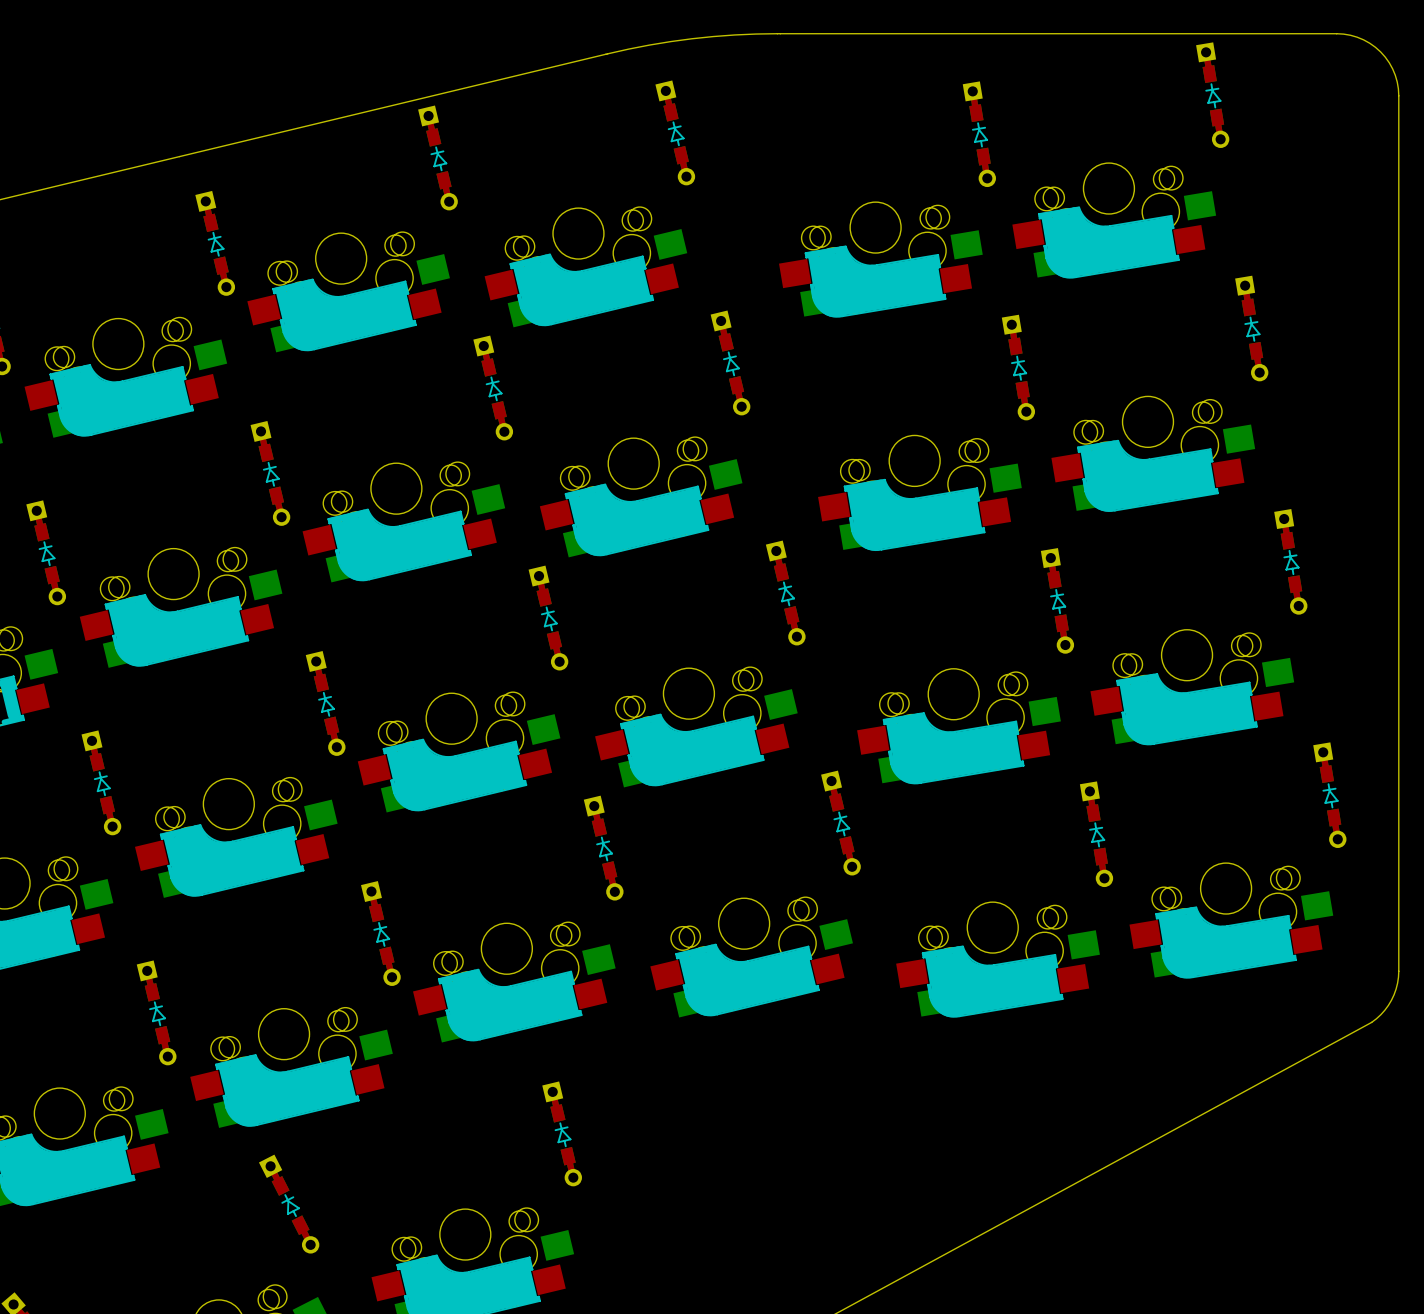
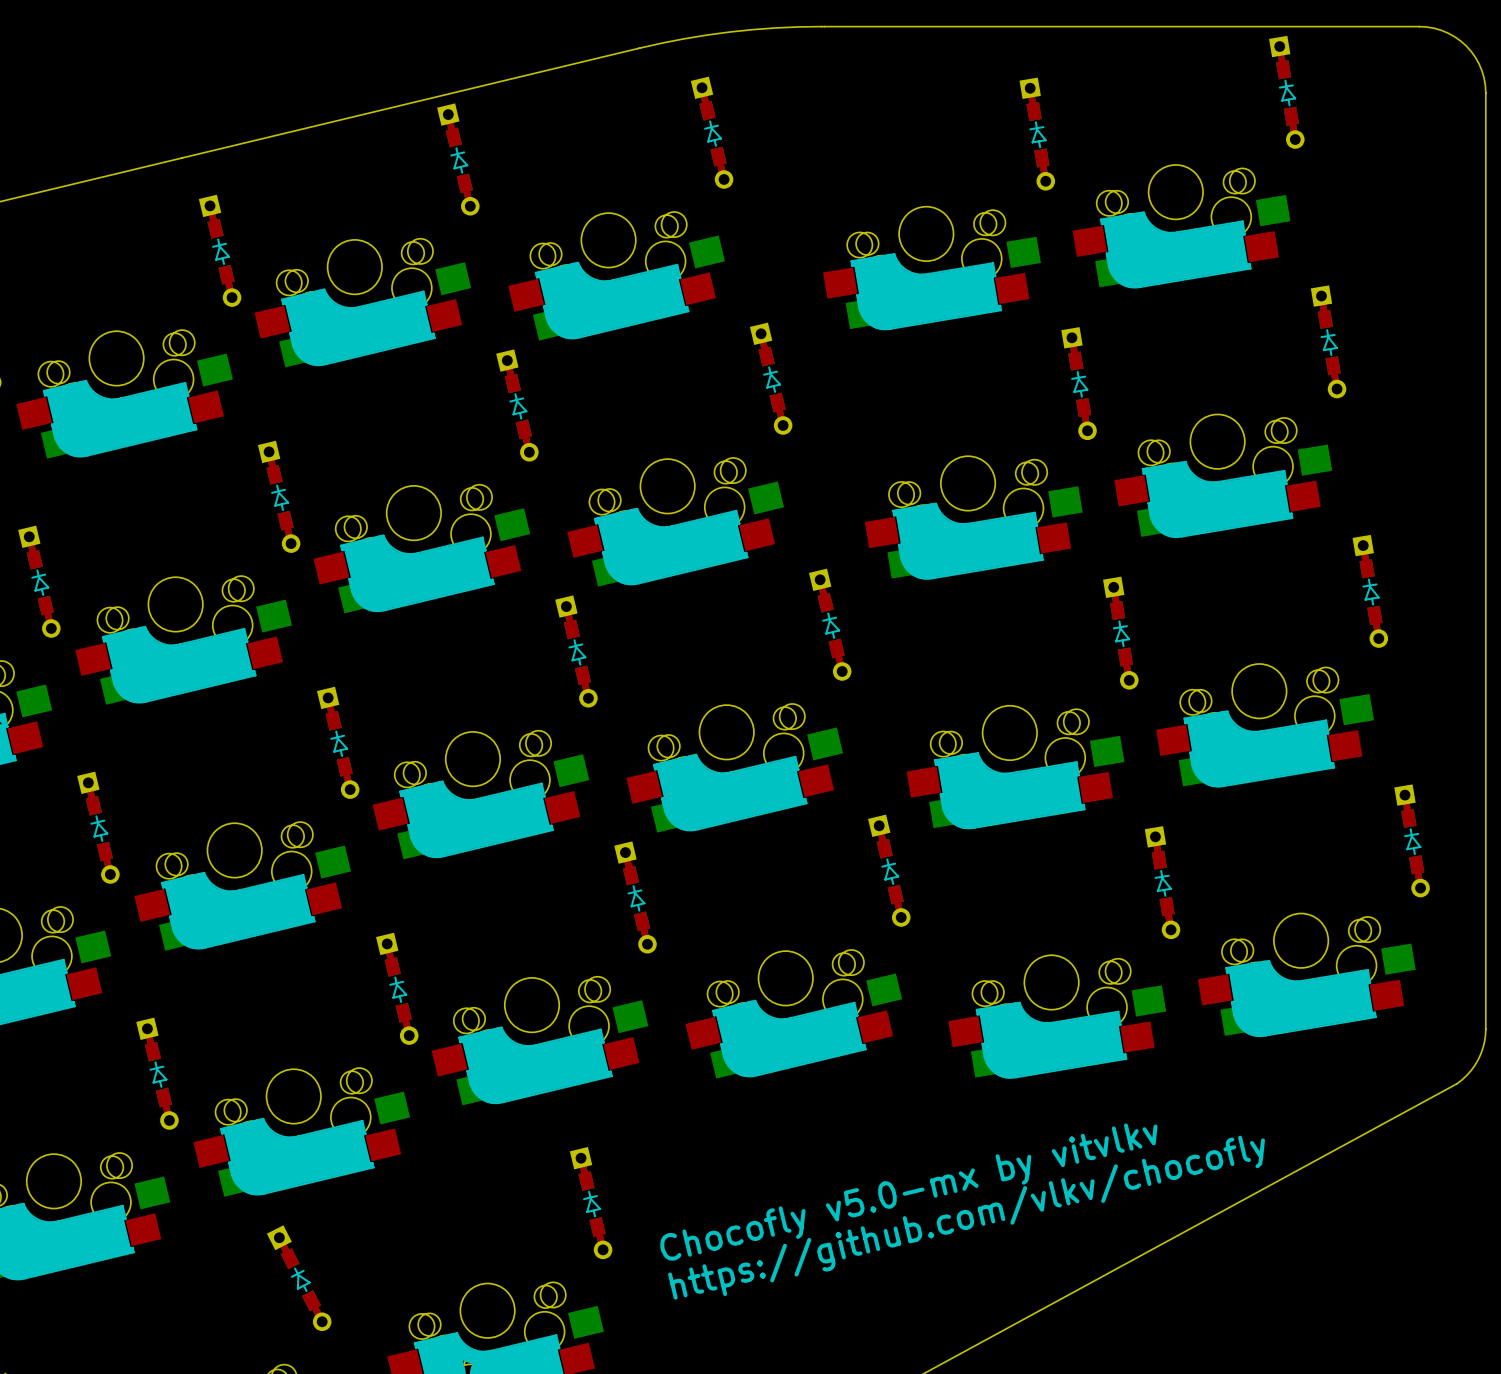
text: none -> Chocofly v5.0-mx by vitvlkv (908, 1192)
text: none -> https://github.com/vlkv/chocofly (966, 1217)

